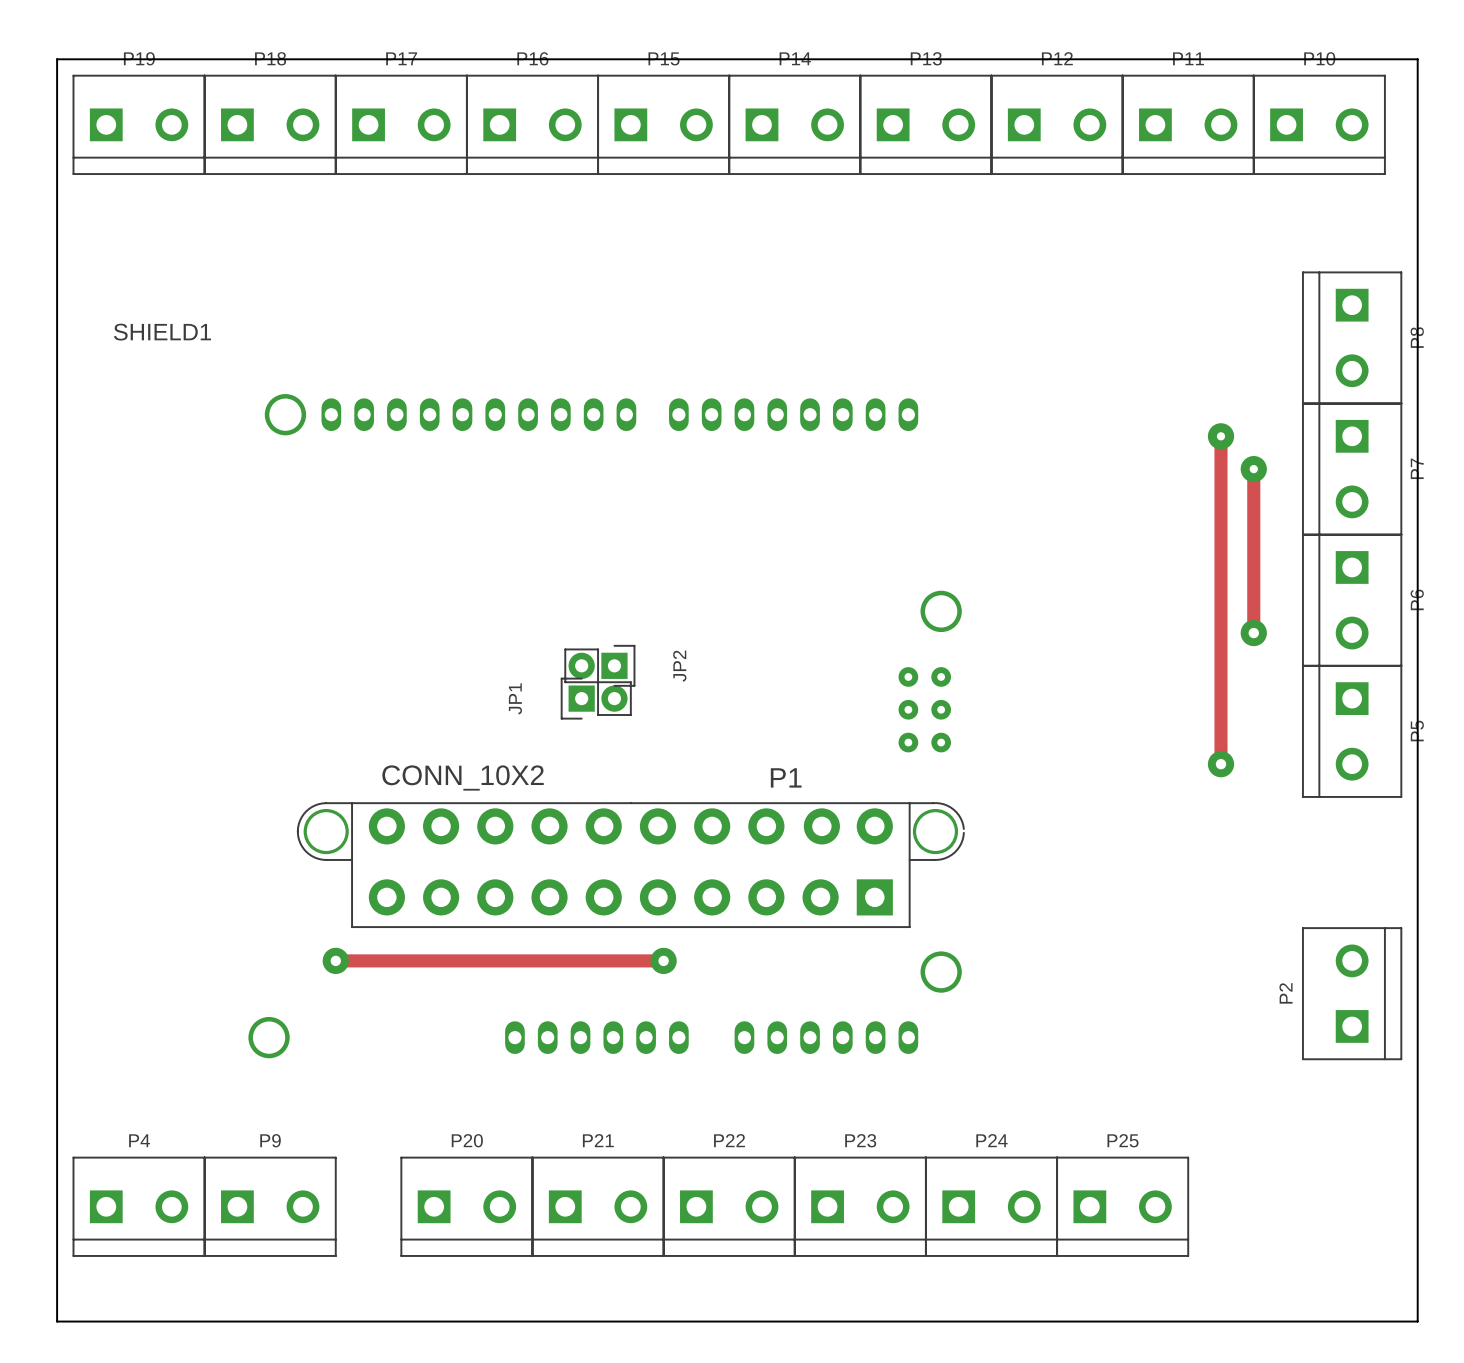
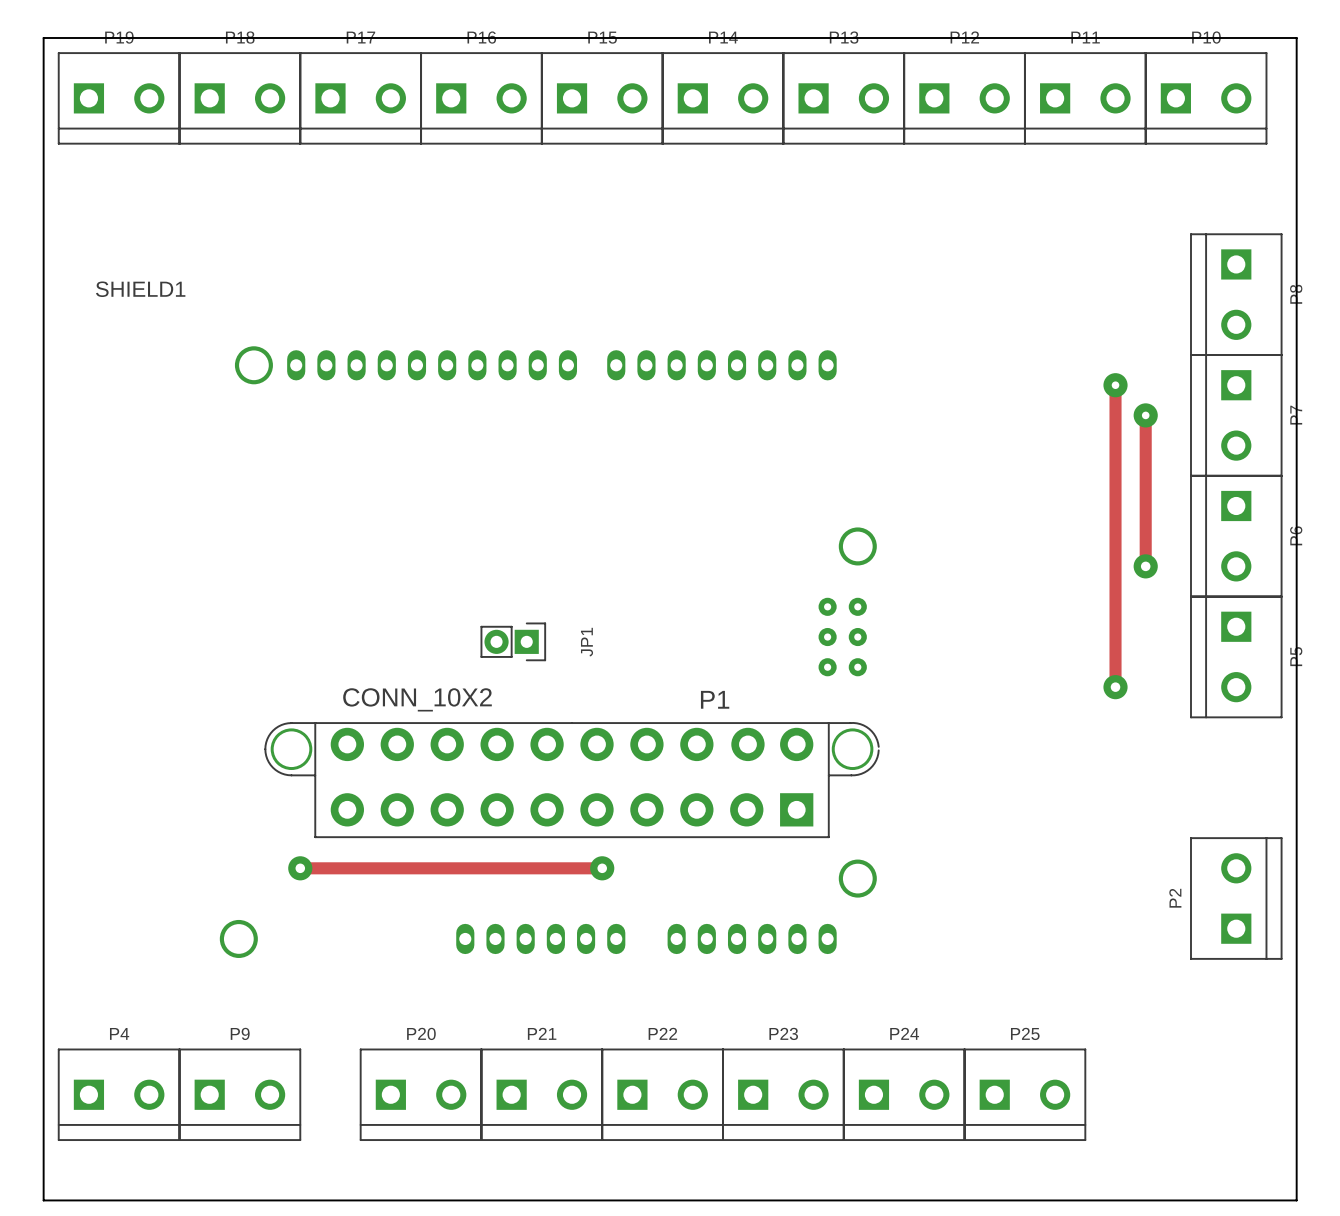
JP2: (599, 665) -> none
JP1 rotation: 0° (596, 698) -> 180° (513, 641)

